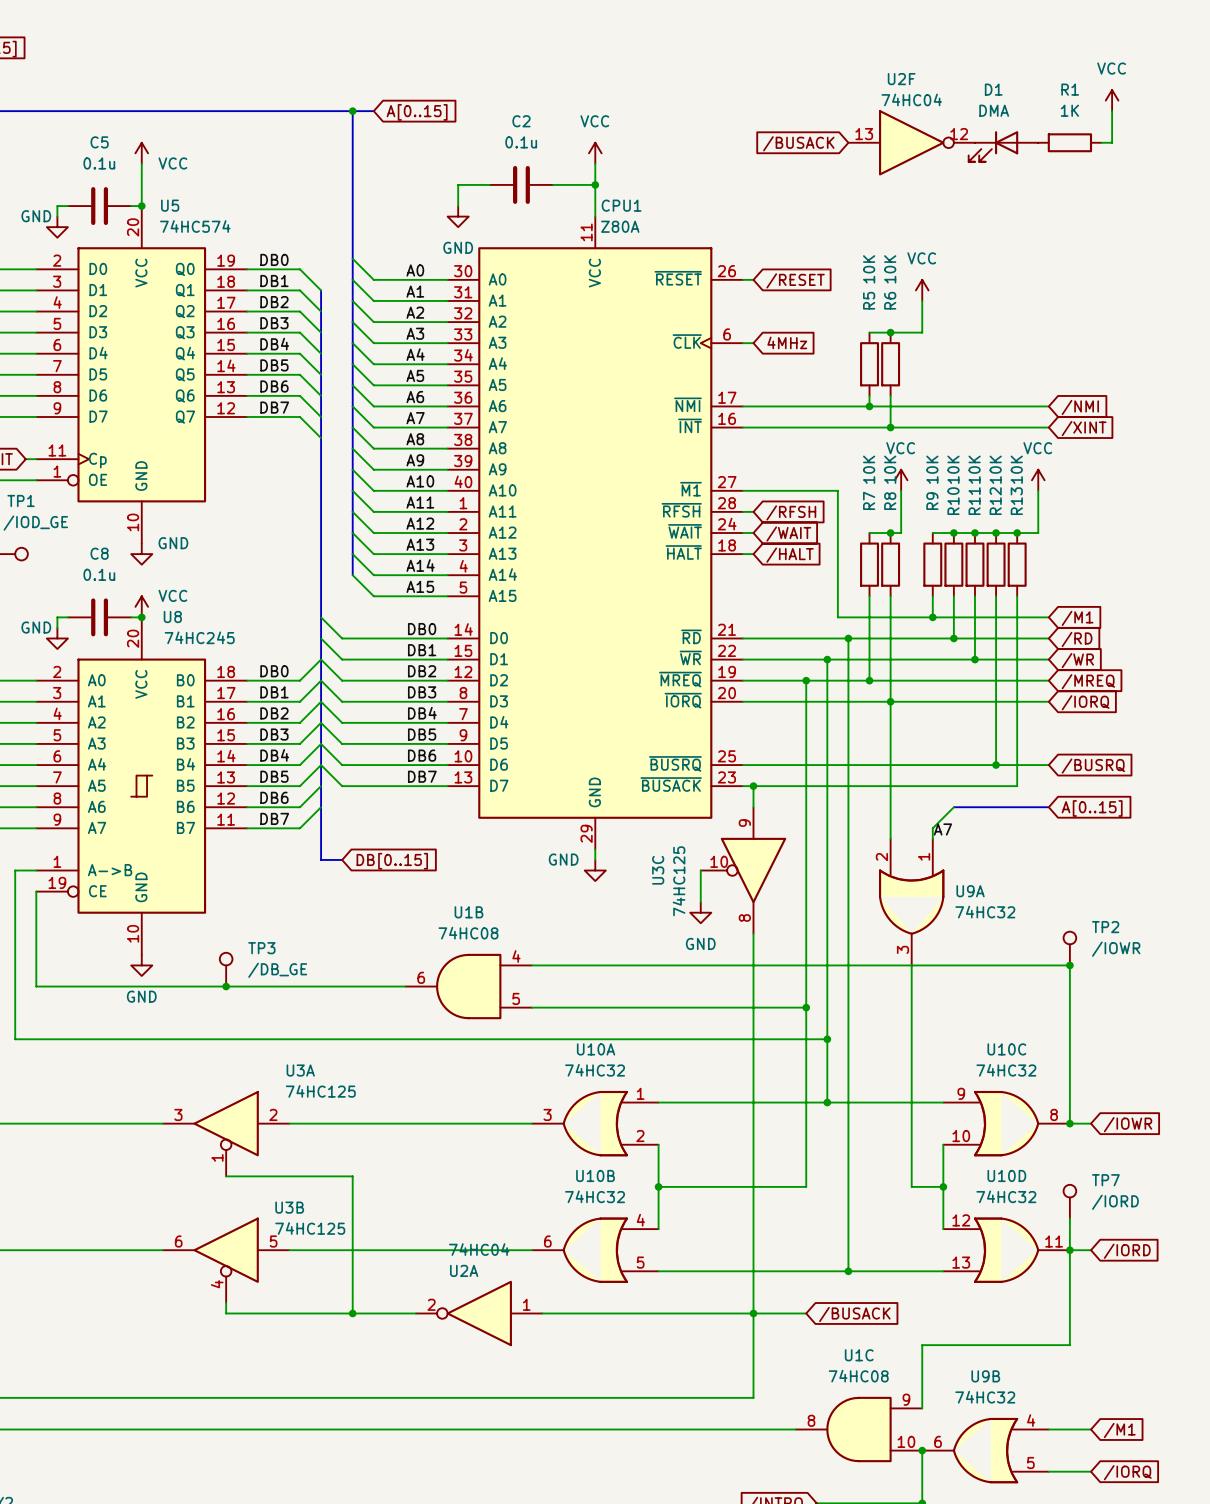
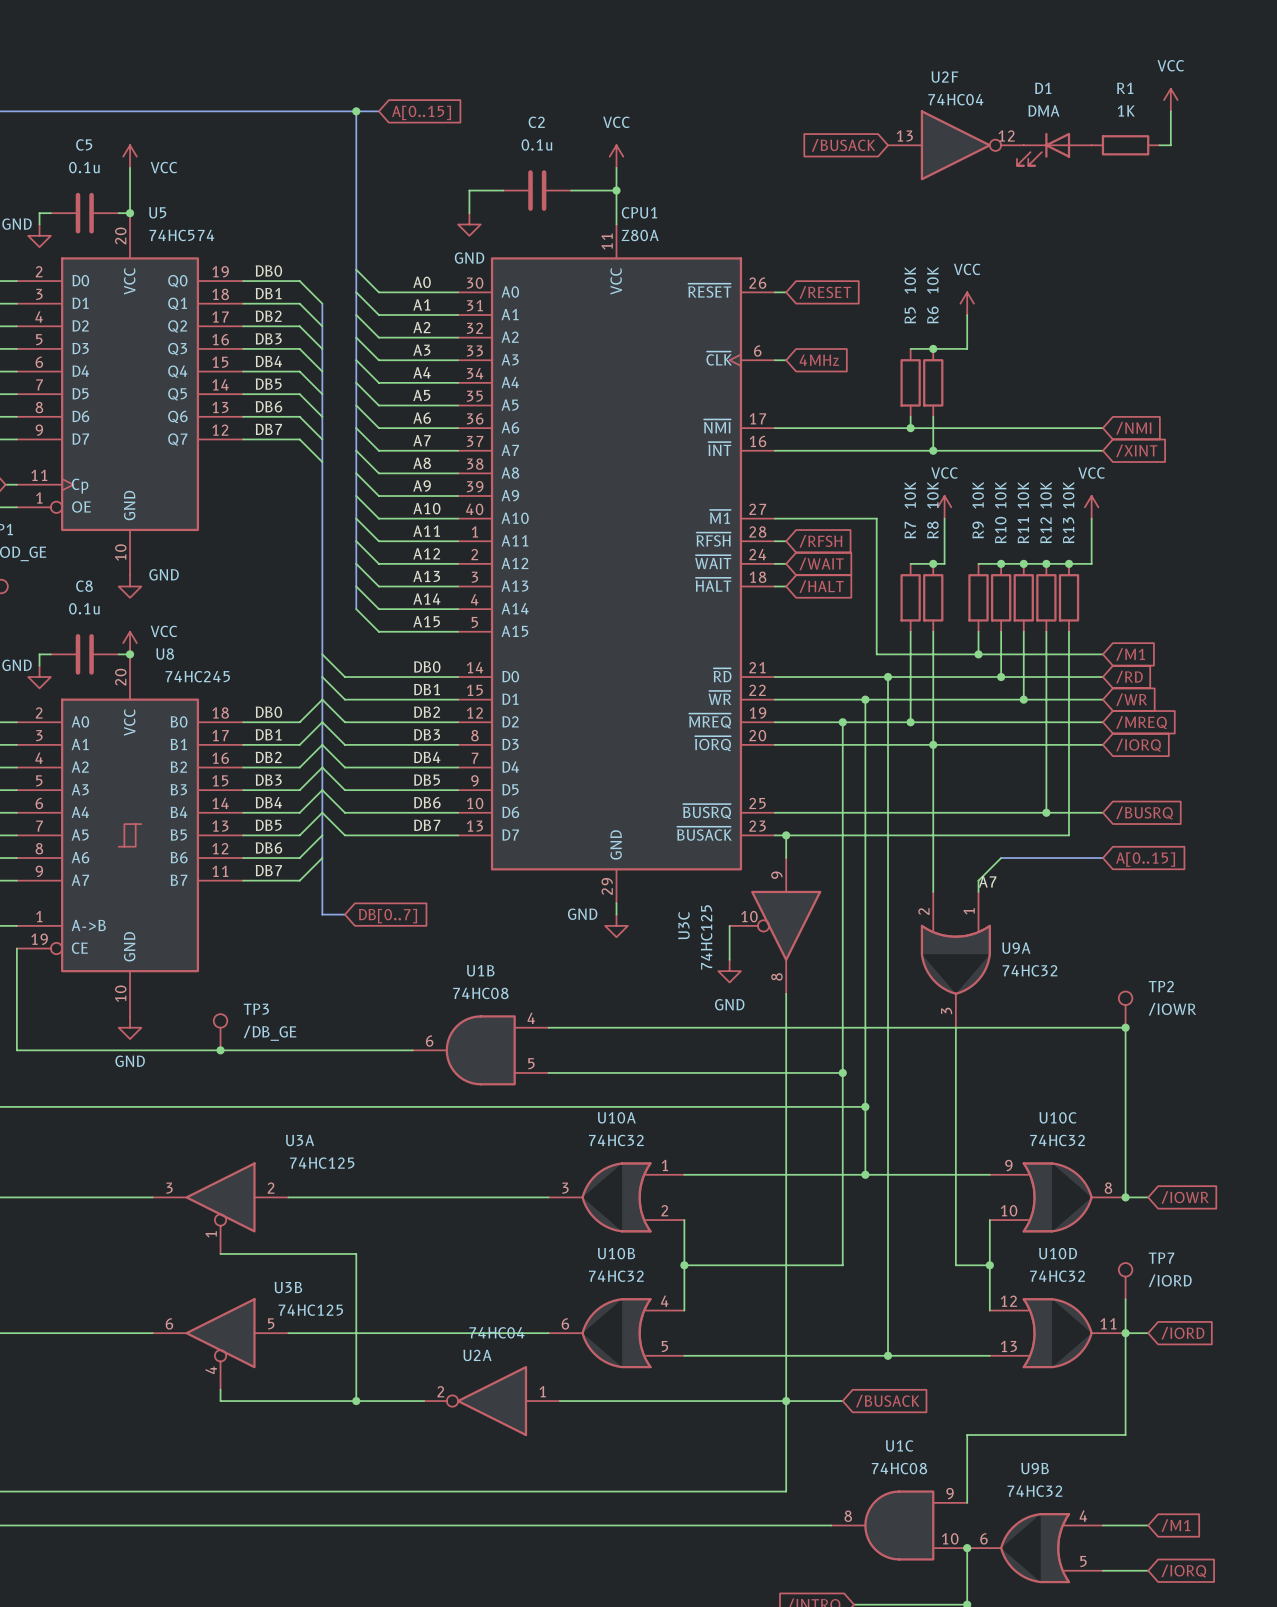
global label: DB[0..15] (392, 861) -> DB[0..7] (388, 916)

